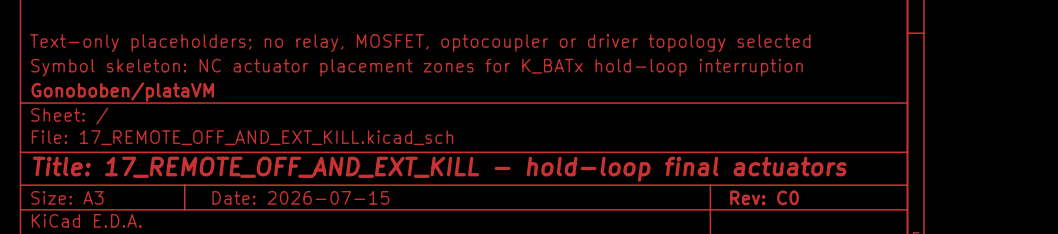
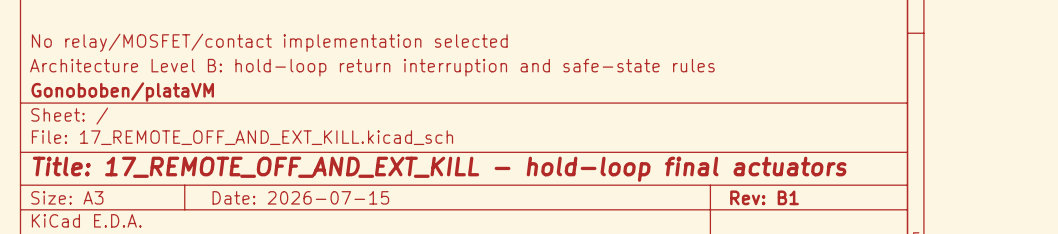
title block: Text-only placeholders; no relay, MOSFET, optocoupler or driver topology selected (420, 43) -> No relay/MOSFET/contact implementation selected (269, 42)
title block: Symbol skeleton: NC actuator placement zones for K_BATx hold-loop interruption (417, 67) -> Architecture Level B: hold-loop return interruption and safe-state rules (372, 67)
title block: Rev: C0 (764, 197) -> Rev: B1 (764, 197)

